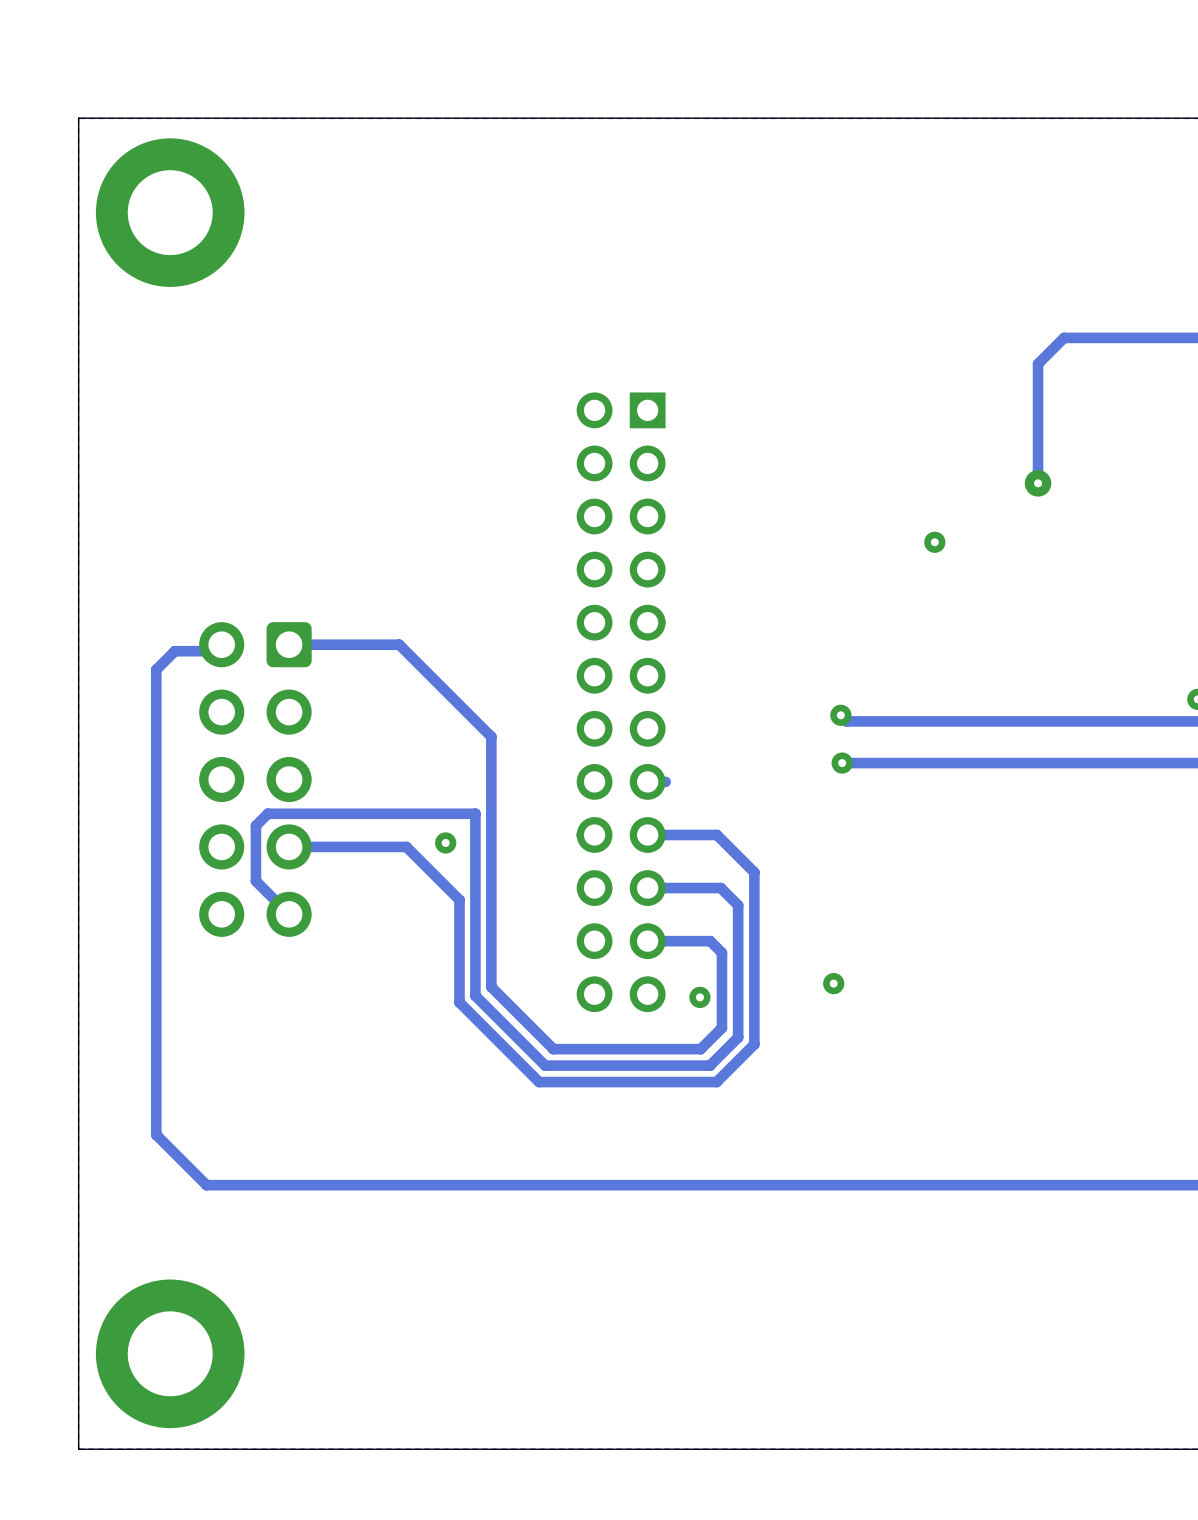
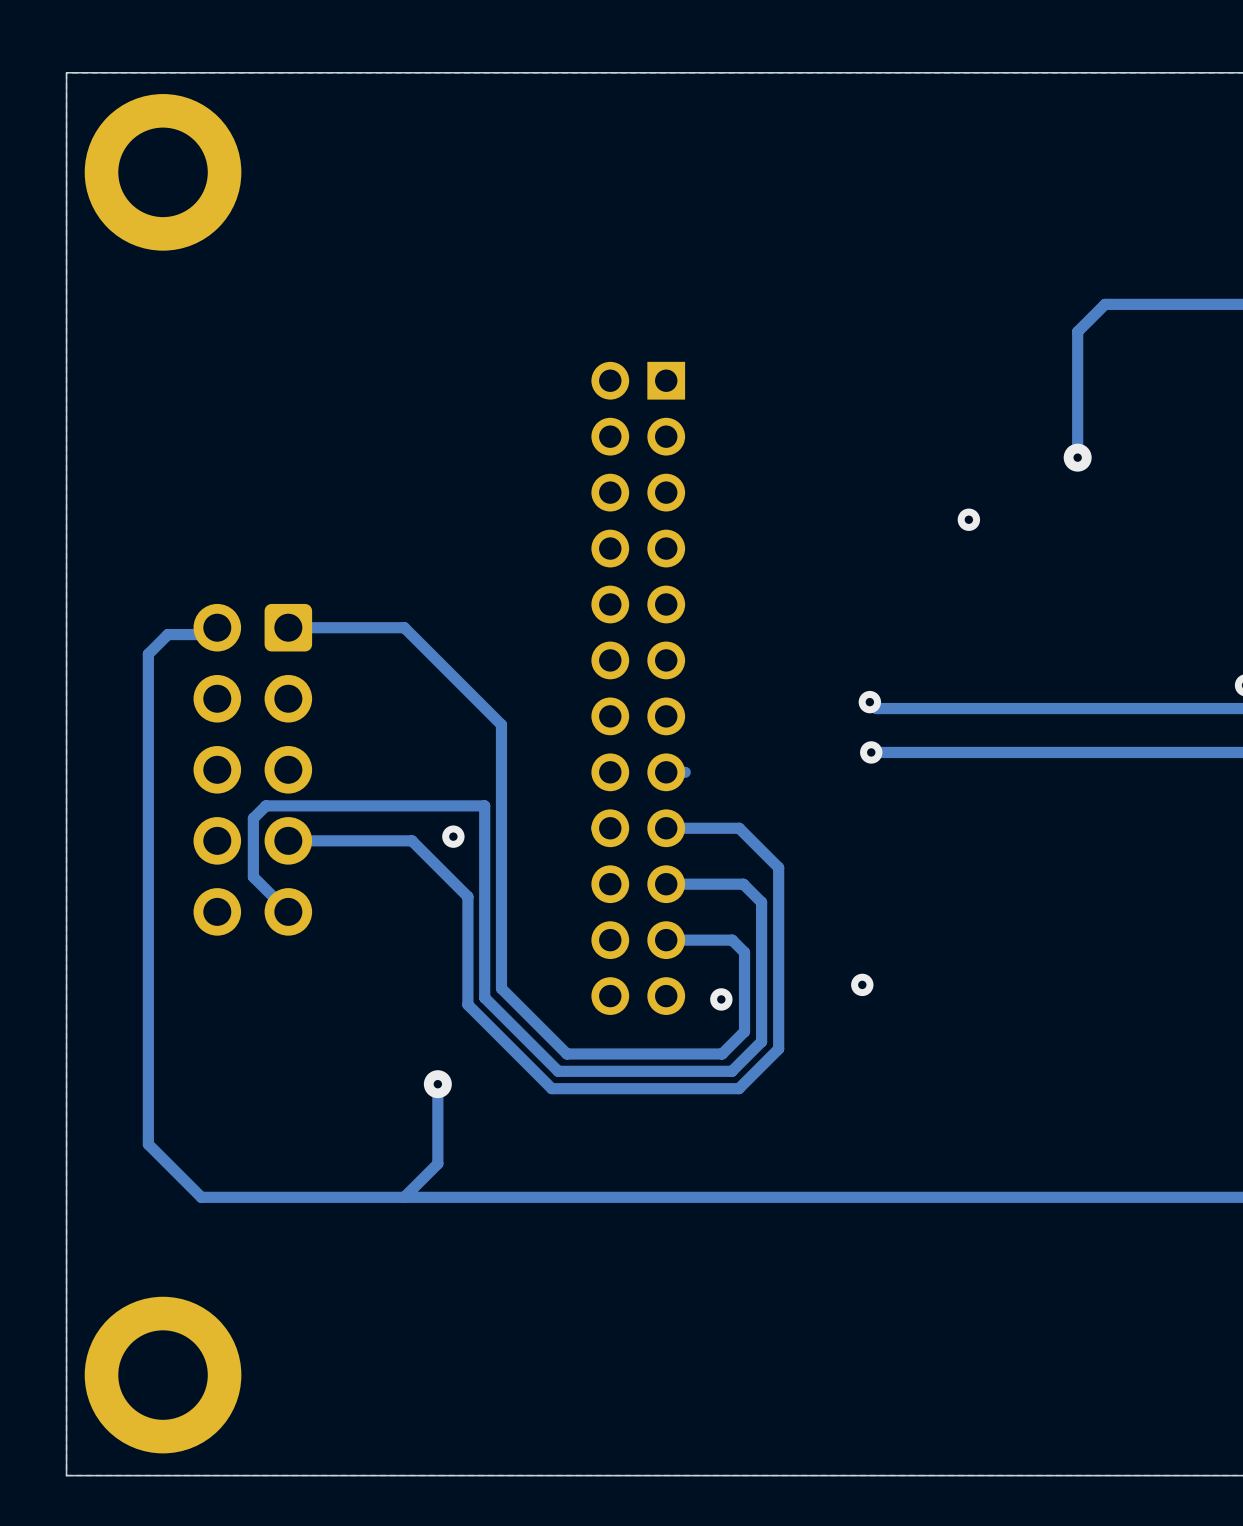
track: none -> (437, 1084) (437, 1163) (404, 1197)
via: none -> (437, 1084)

